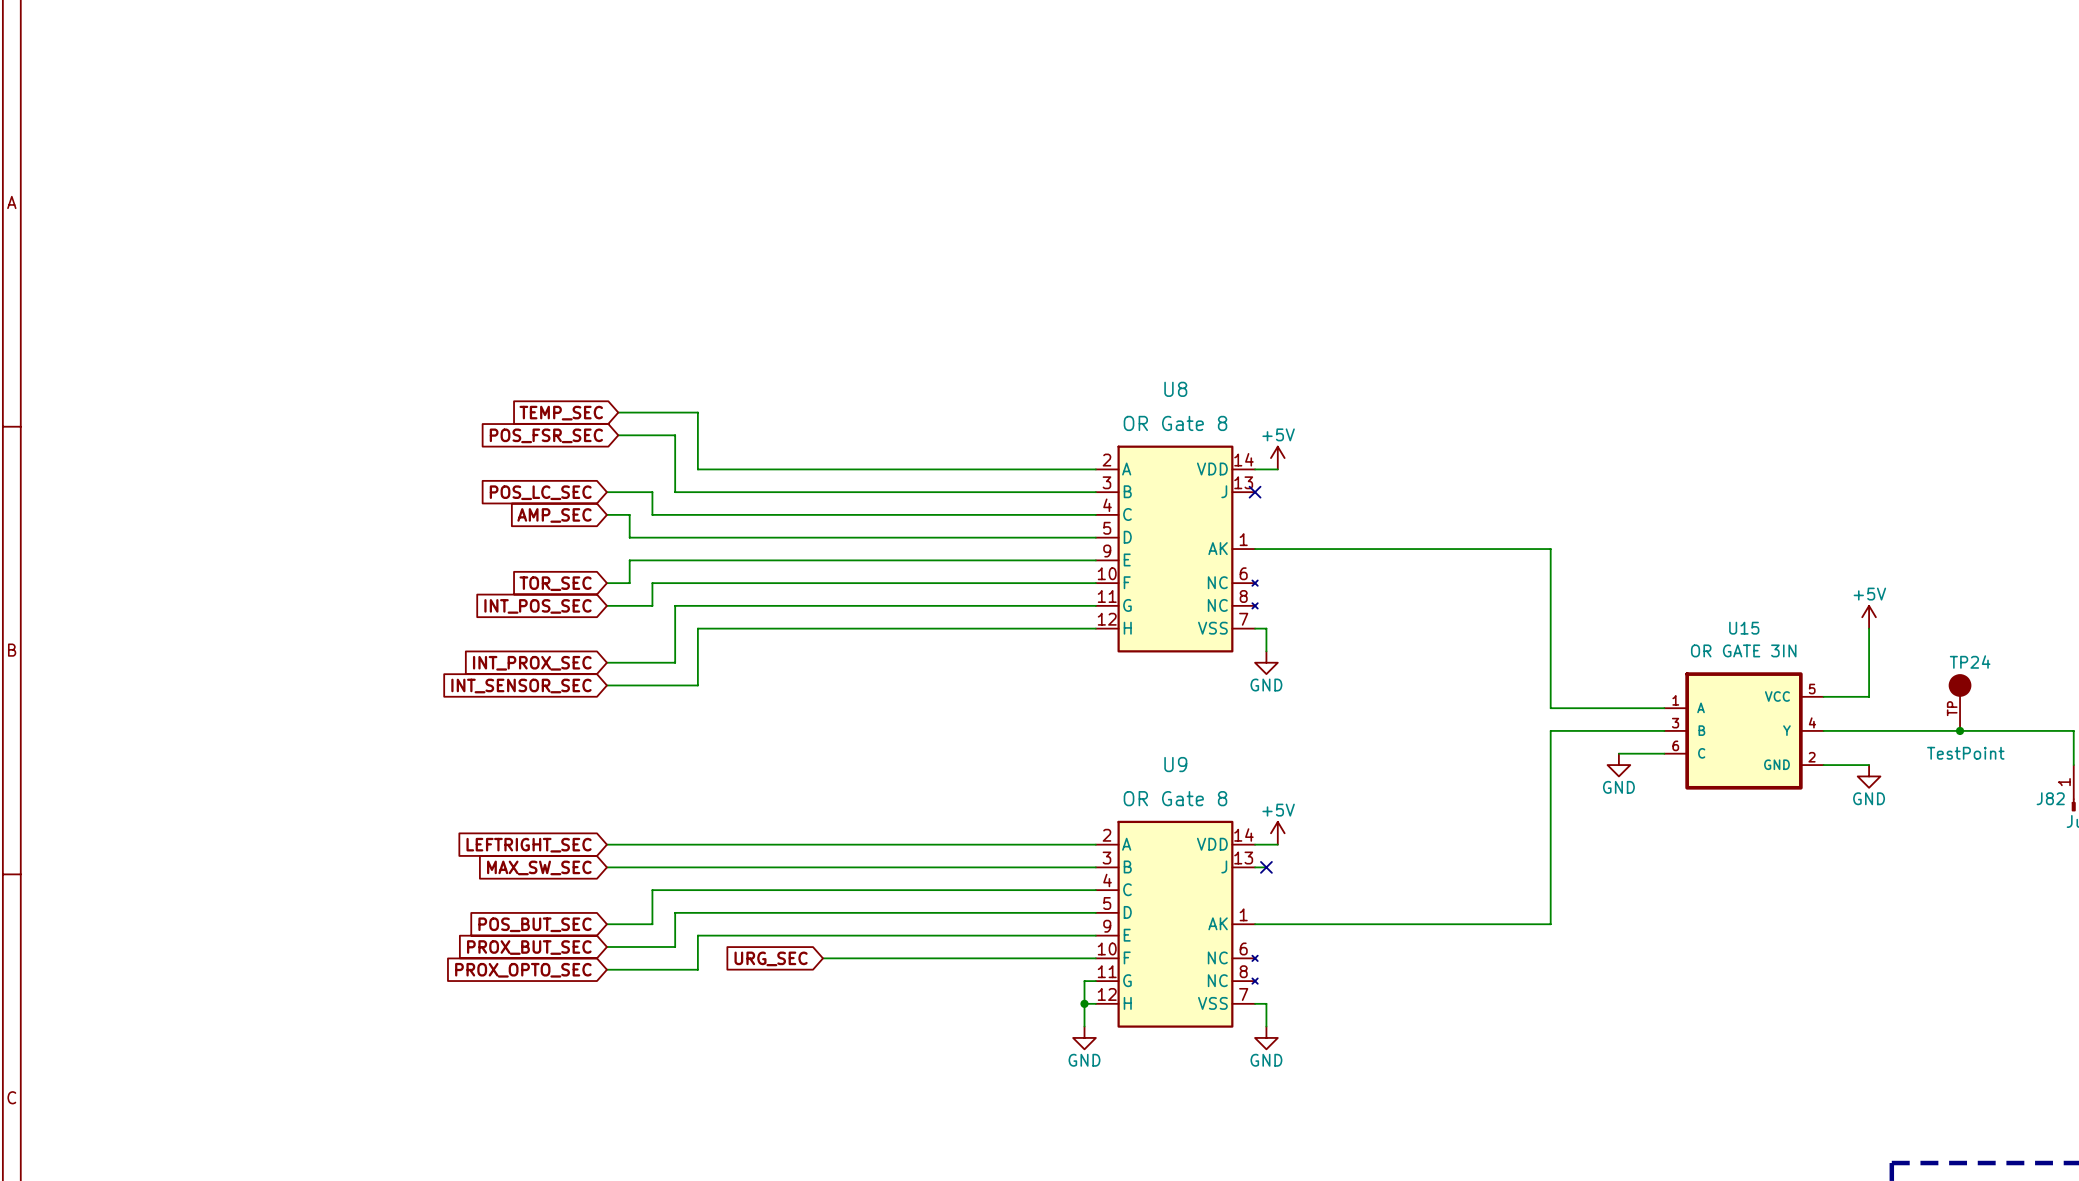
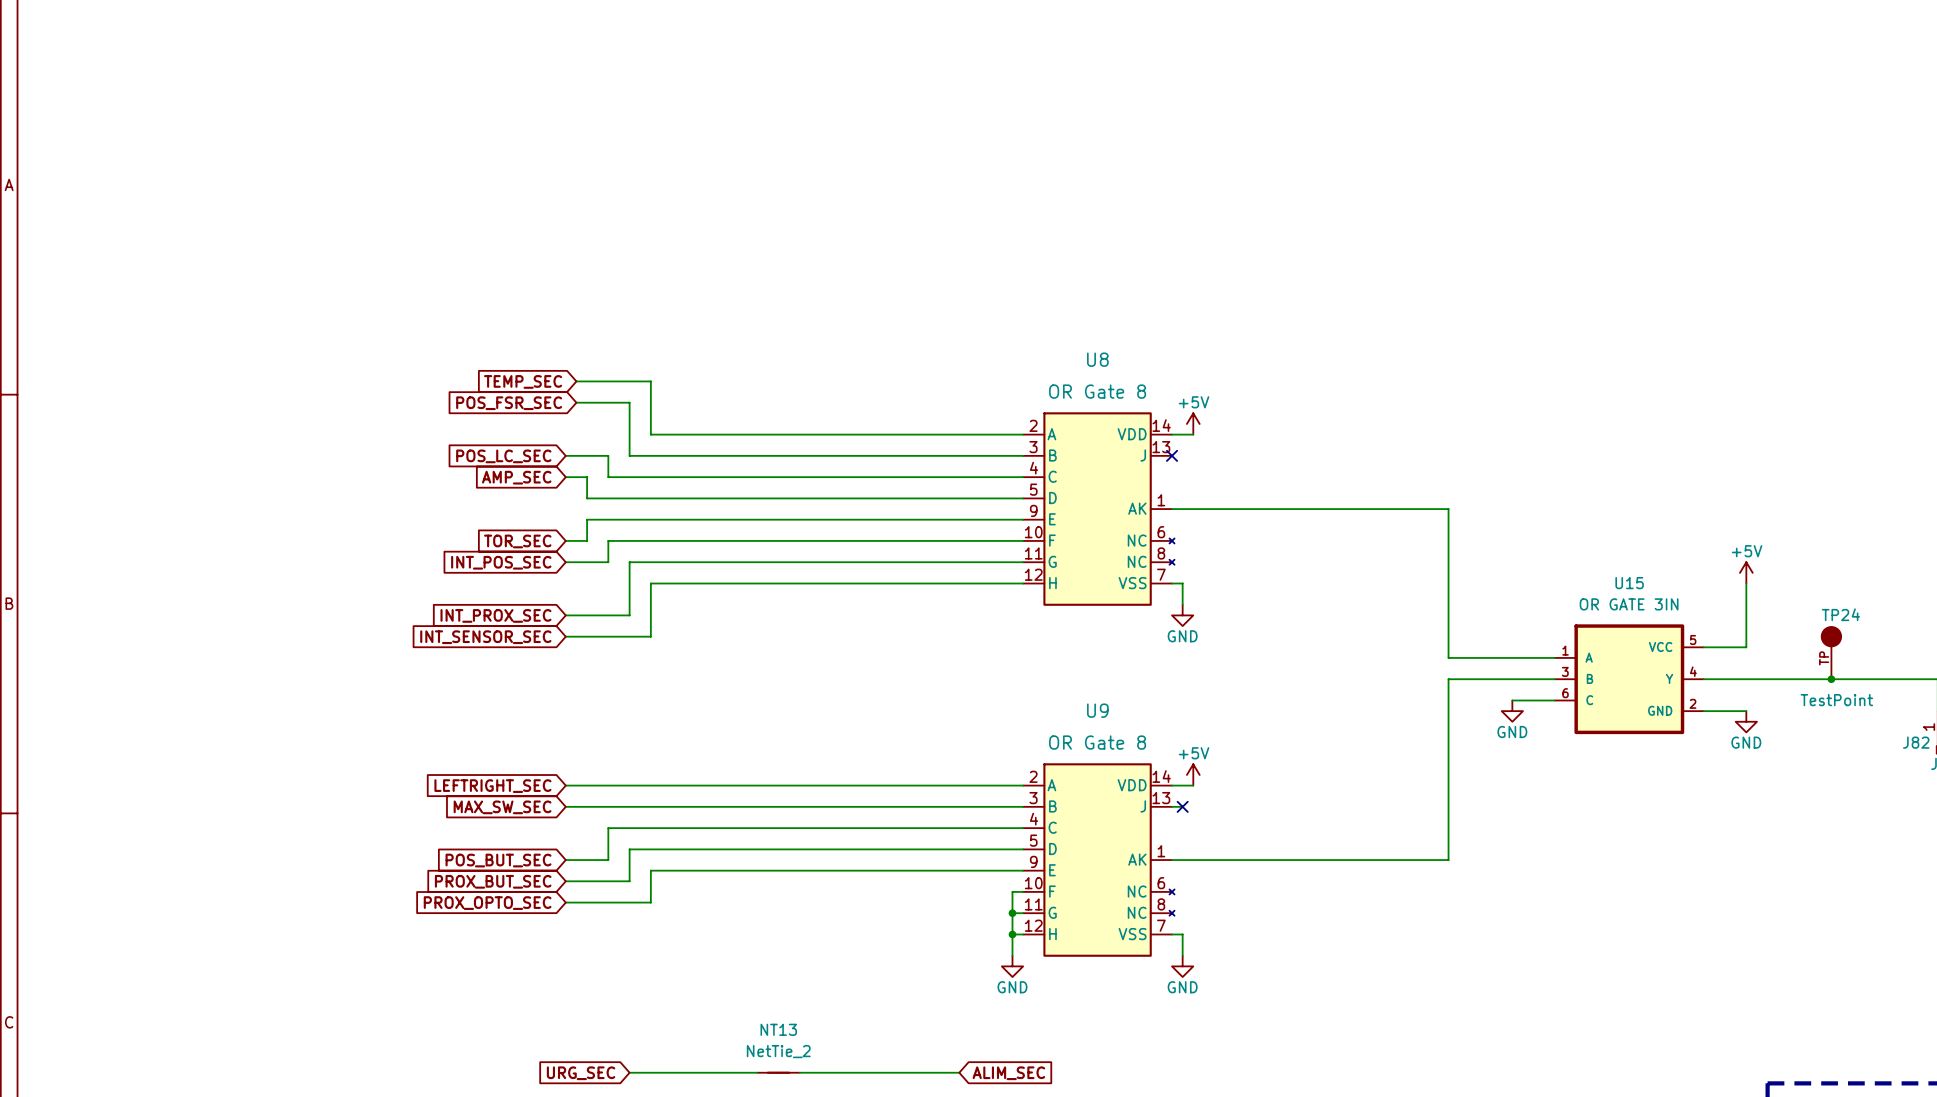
global label: URG_SEC (771, 958) -> none
wire: (822, 958) (1084, 958) -> (1012, 913) (1012, 891)
junction: none -> (1012, 913)
wire: none -> (629, 1072) (757, 1072)
NT13: none -> NetTie_2 (778, 1072)
wire: none -> (799, 1072) (959, 1072)
global label: none -> URG_SEC (581, 1073)
global label: none -> ALIM_SEC (1008, 1073)

